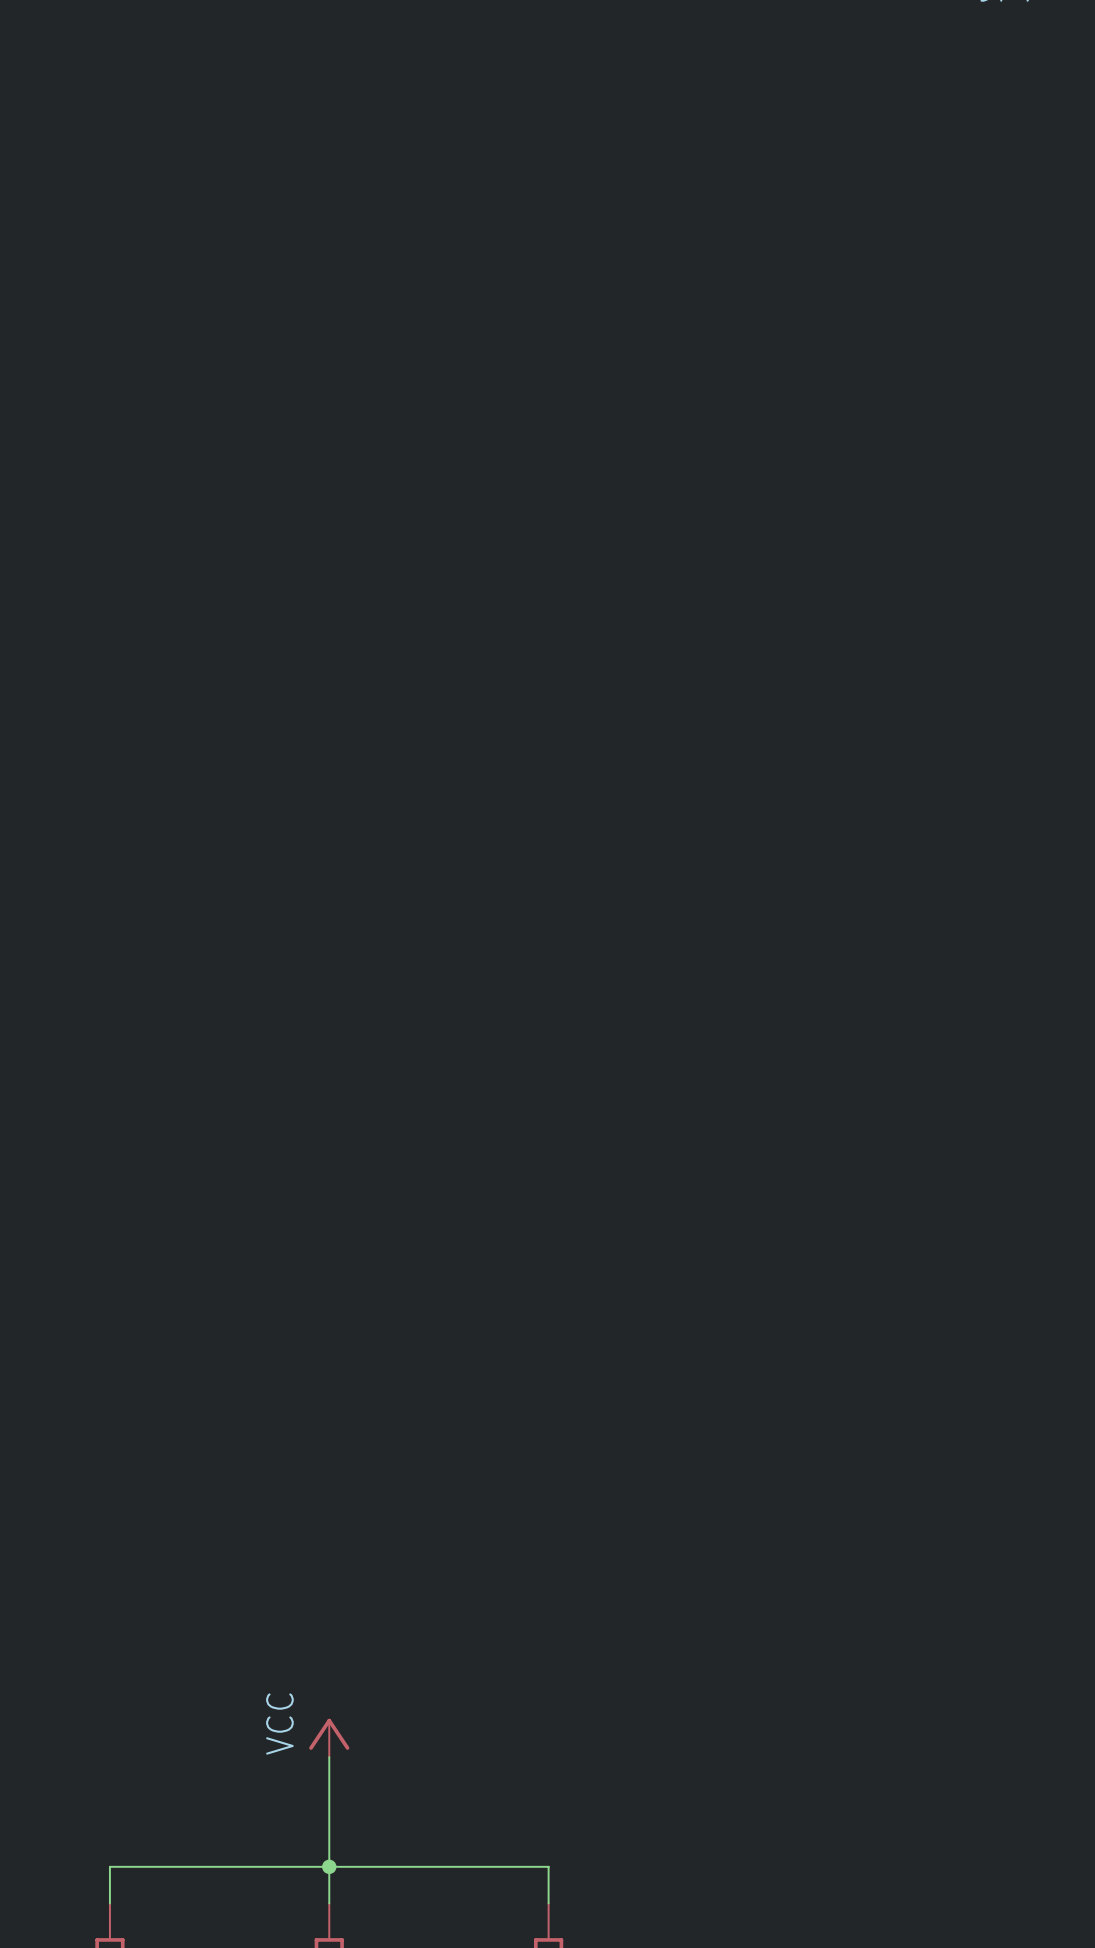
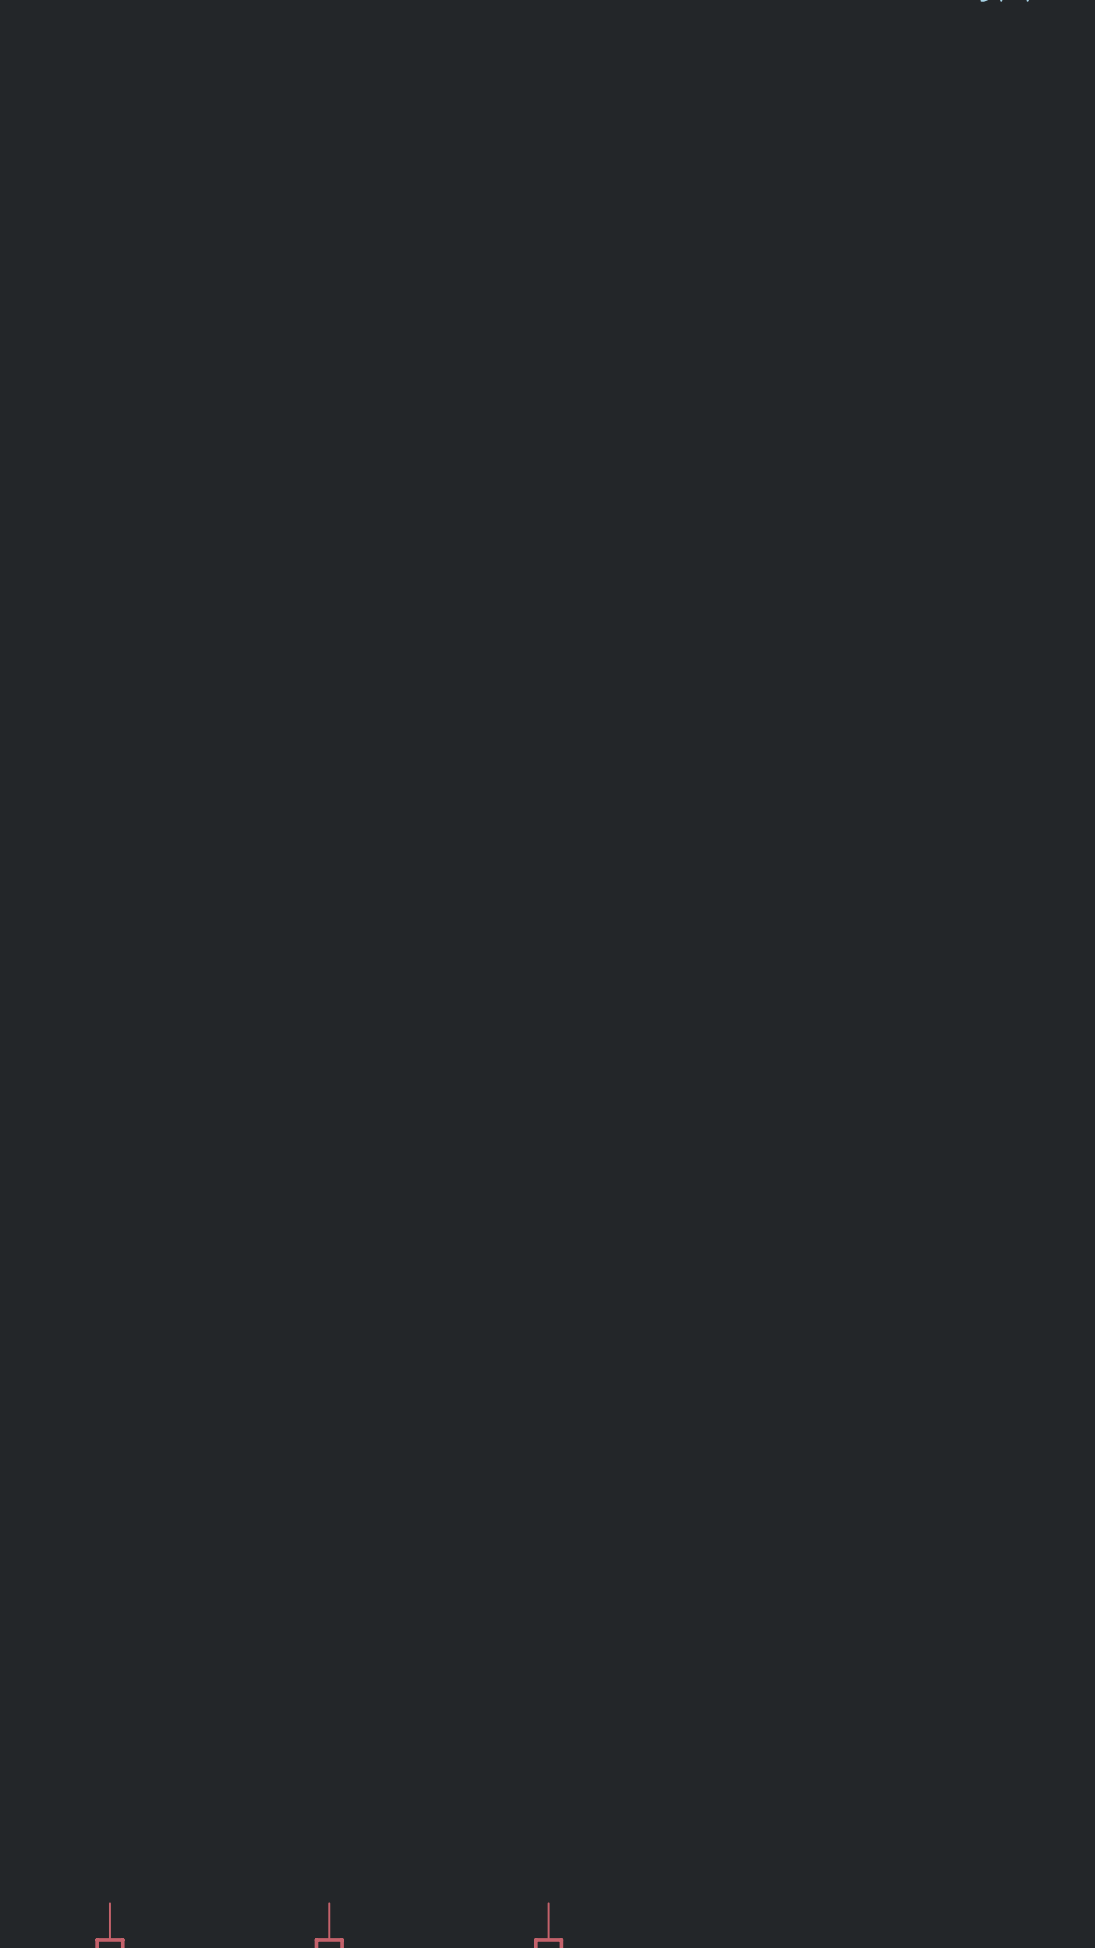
power symbol: VCC (329, 1737) -> none
wire: (329, 1757) (329, 1903) -> none
junction: (329, 1866) -> none
wire: (109, 1903) (109, 1866) (548, 1866) (548, 1903) -> none

